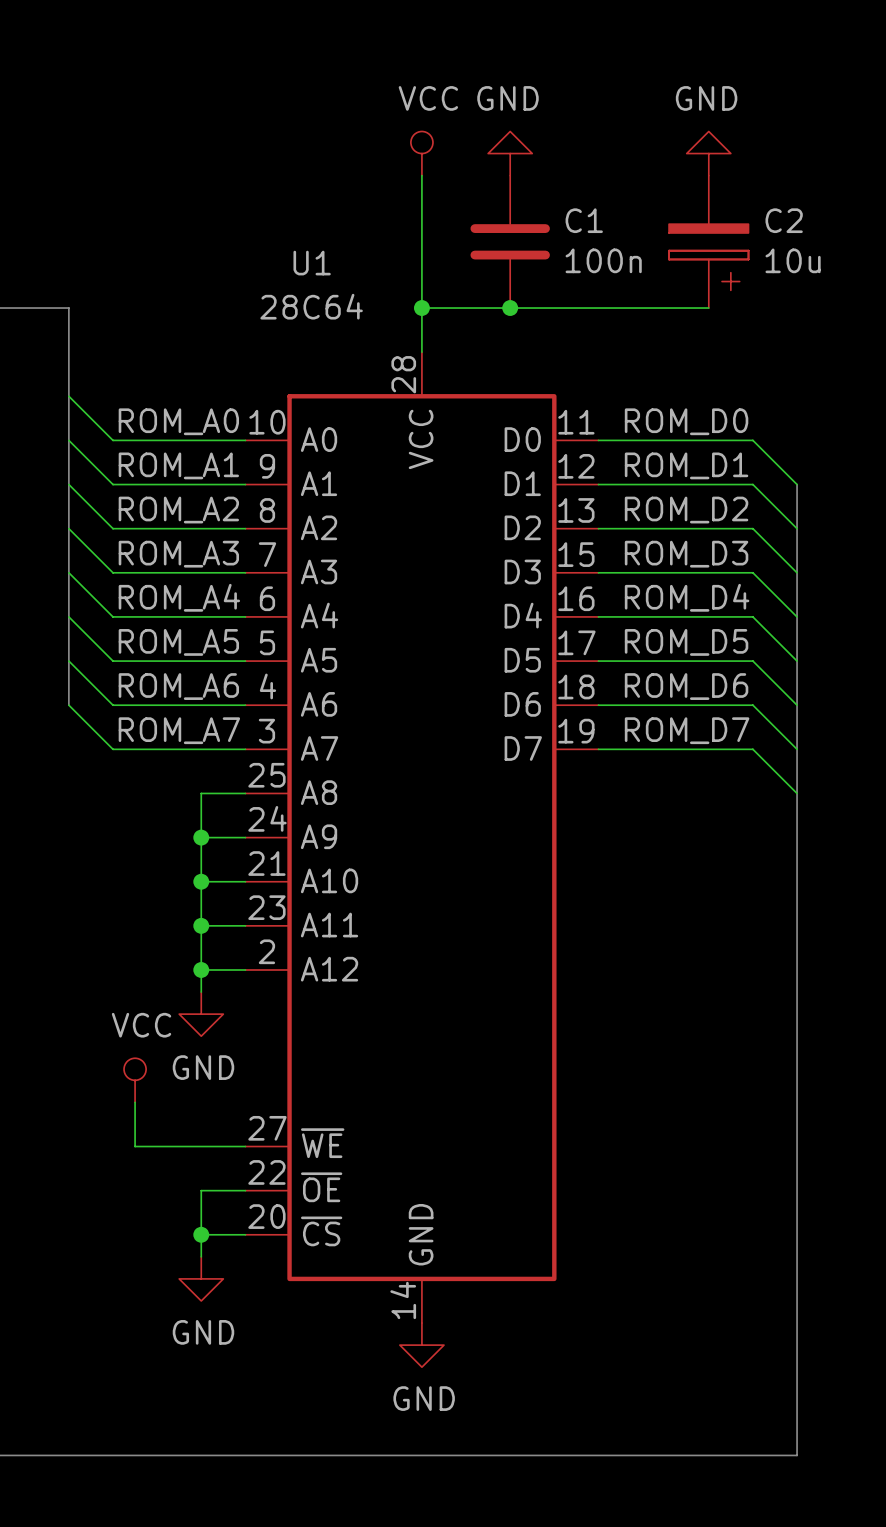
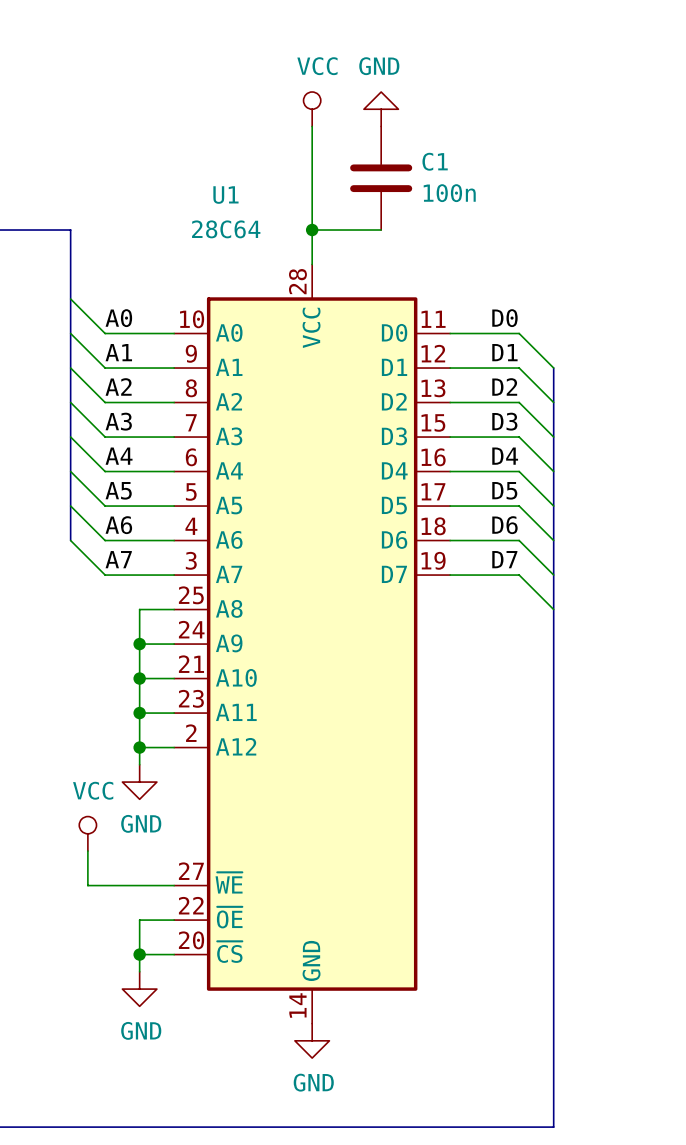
power symbol: GND (708, 153) -> none
C2: 10u (708, 241) -> none
bus: (68, 308) (68, 705) -> (36, 230) (70, 230) (70, 540)
wire: (510, 308) (708, 308) -> none
junction: (510, 308) -> none
wire: (68, 396) (113, 440) (157, 440) -> (70, 299) (105, 333)
label: none -> A0 (118, 318)
label: none -> D0 (504, 318)
label: ROM_A0 (178, 421) -> none
label: ROM_D0 (686, 421) -> none
wire: (68, 440) (113, 484) (157, 484) -> (70, 333) (105, 368)
wire: (686, 440) (752, 440) (797, 484) -> (519, 333) (553, 368)
label: none -> A1 (118, 352)
label: none -> D1 (504, 352)
label: ROM_A1 (178, 465) -> none
label: ROM_D1 (686, 465) -> none
wire: (68, 484) (113, 528) (157, 528) -> (70, 368) (105, 402)
wire: (686, 484) (752, 484) (797, 528) -> (519, 368) (553, 402)
bus: (797, 484) (797, 1455) (730, 1455) -> (553, 368) (553, 1127)
label: none -> A2 (118, 386)
label: none -> D2 (504, 386)
label: ROM_A2 (178, 510) -> none
label: ROM_D2 (686, 510) -> none
wire: (68, 528) (113, 572) (157, 572) -> (70, 402) (105, 437)
wire: (686, 528) (752, 528) (797, 572) -> (519, 402) (553, 437)
label: none -> A3 (118, 421)
label: none -> D3 (504, 421)
label: ROM_A3 (178, 554) -> none
label: ROM_D3 (686, 554) -> none
wire: (68, 572) (113, 616) (157, 616) -> (70, 437) (105, 471)
wire: (686, 572) (752, 572) (797, 616) -> (519, 437) (553, 471)
label: none -> A4 (119, 456)
label: none -> D4 (505, 456)
label: ROM_A4 (179, 597) -> none
label: ROM_D4 (687, 597) -> none
wire: (68, 616) (113, 661) (157, 661) -> (70, 471) (105, 506)
wire: (686, 616) (752, 616) (797, 661) -> (519, 471) (553, 506)
label: none -> A5 (118, 490)
label: none -> D5 (504, 490)
label: ROM_A5 (178, 642) -> none
label: ROM_D5 (686, 642) -> none
wire: (68, 661) (113, 705) (157, 705) -> (70, 506) (105, 540)
wire: (686, 661) (752, 661) (797, 705) -> (519, 506) (553, 540)
label: none -> A6 (118, 525)
label: none -> D6 (504, 525)
label: ROM_A6 (178, 686) -> none
label: ROM_D6 (686, 686) -> none
wire: (68, 705) (113, 749) (157, 749) -> (70, 540) (105, 575)
wire: (686, 705) (752, 705) (797, 749) -> (519, 540) (553, 575)
label: none -> A7 (118, 559)
label: none -> D7 (504, 559)
label: ROM_A7 (179, 730) -> none
label: ROM_D7 (687, 730) -> none
wire: (686, 749) (752, 749) (797, 793) -> (519, 575) (553, 609)

